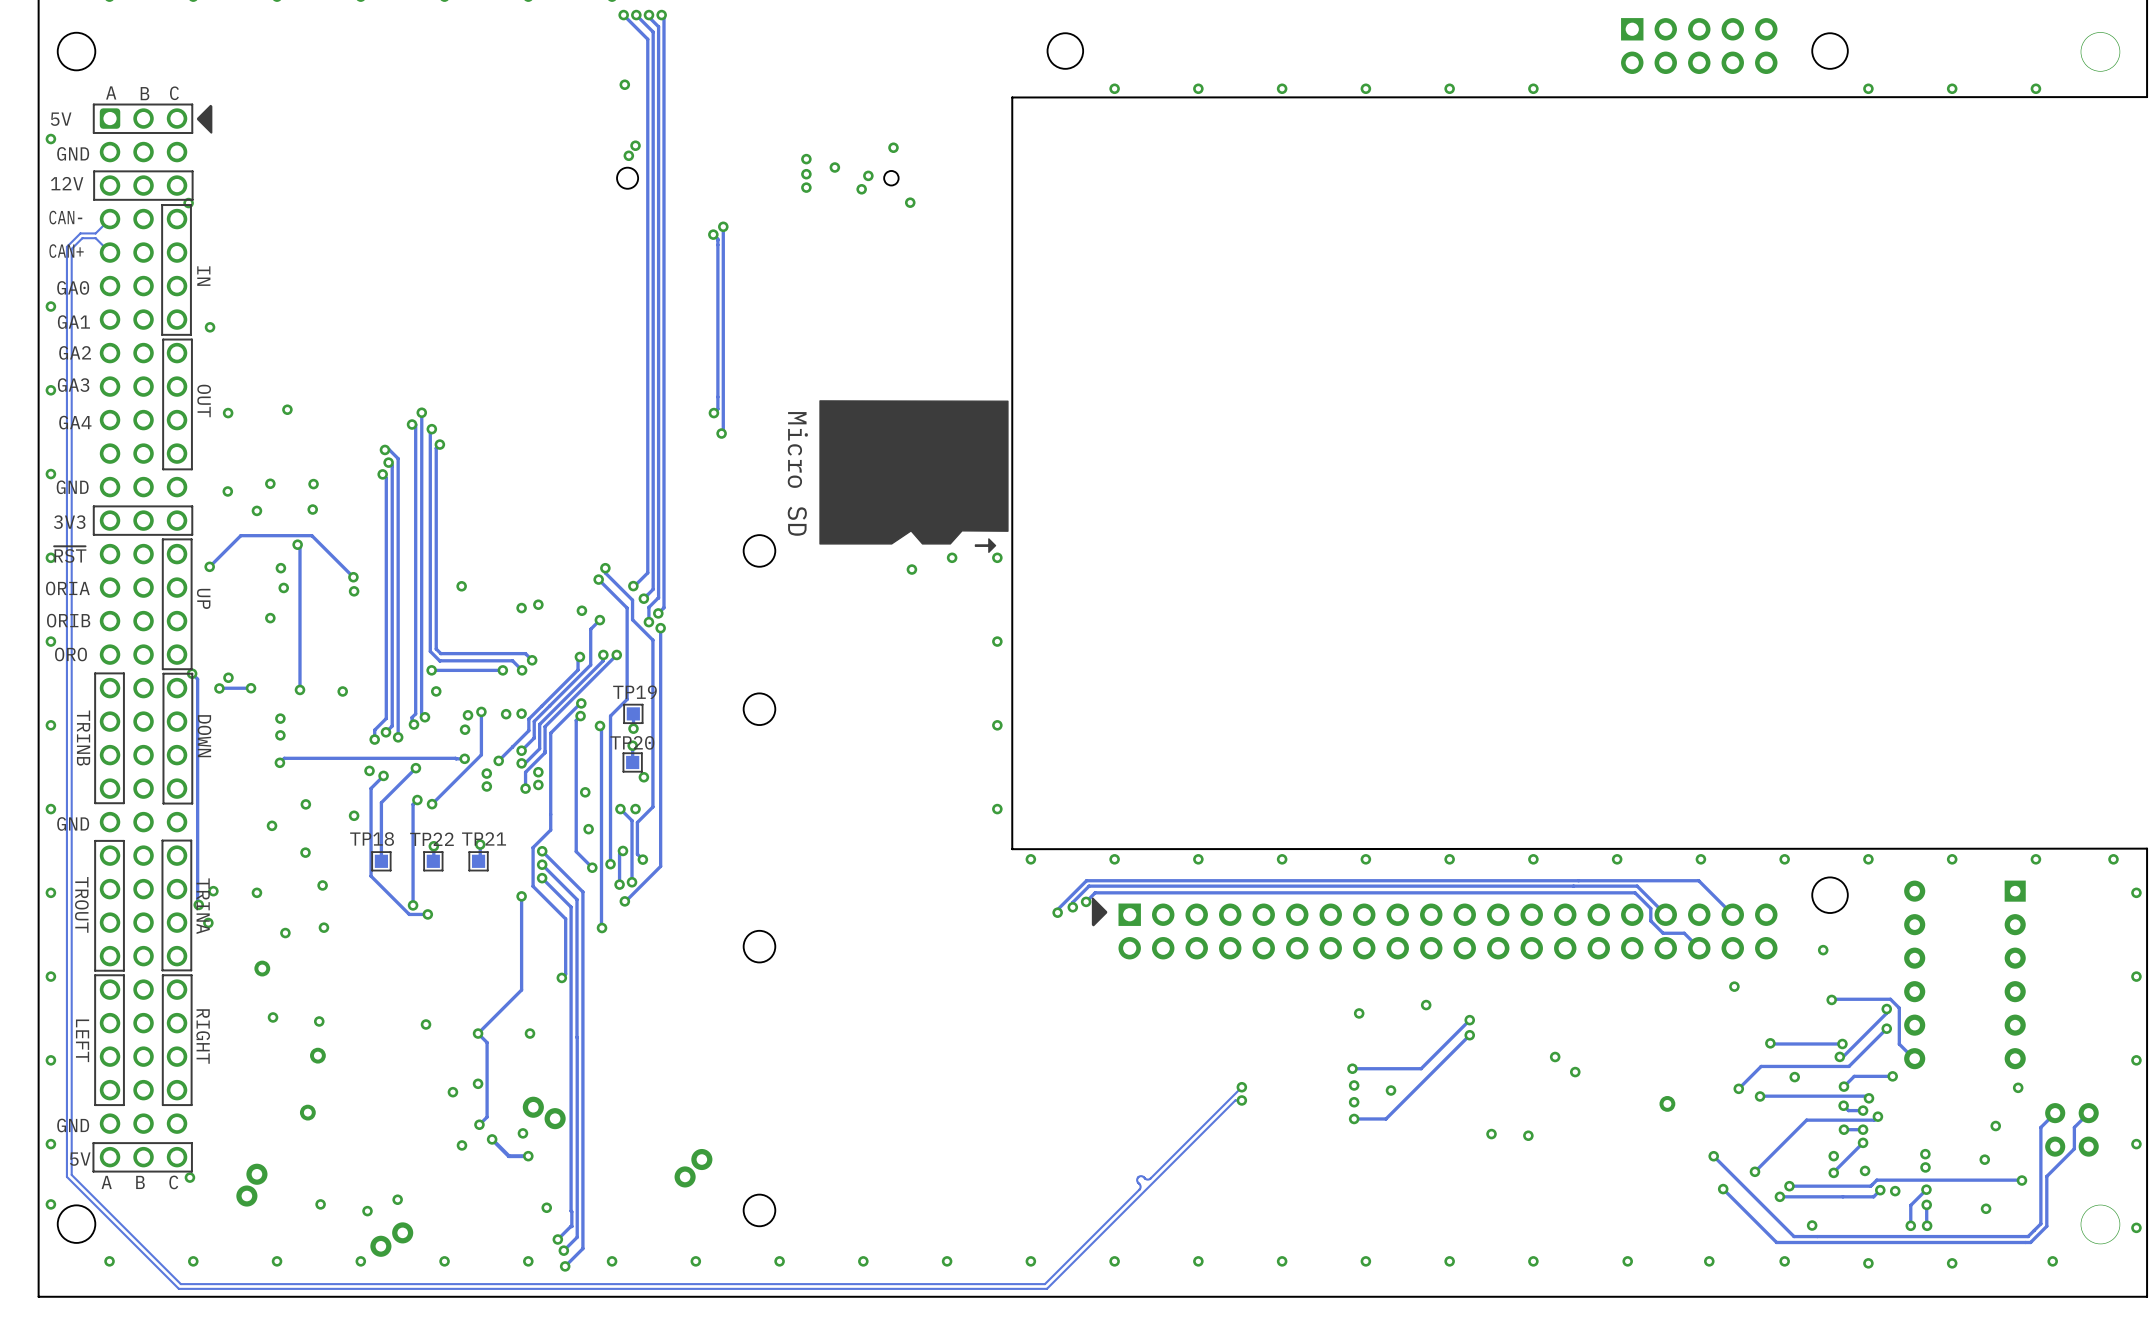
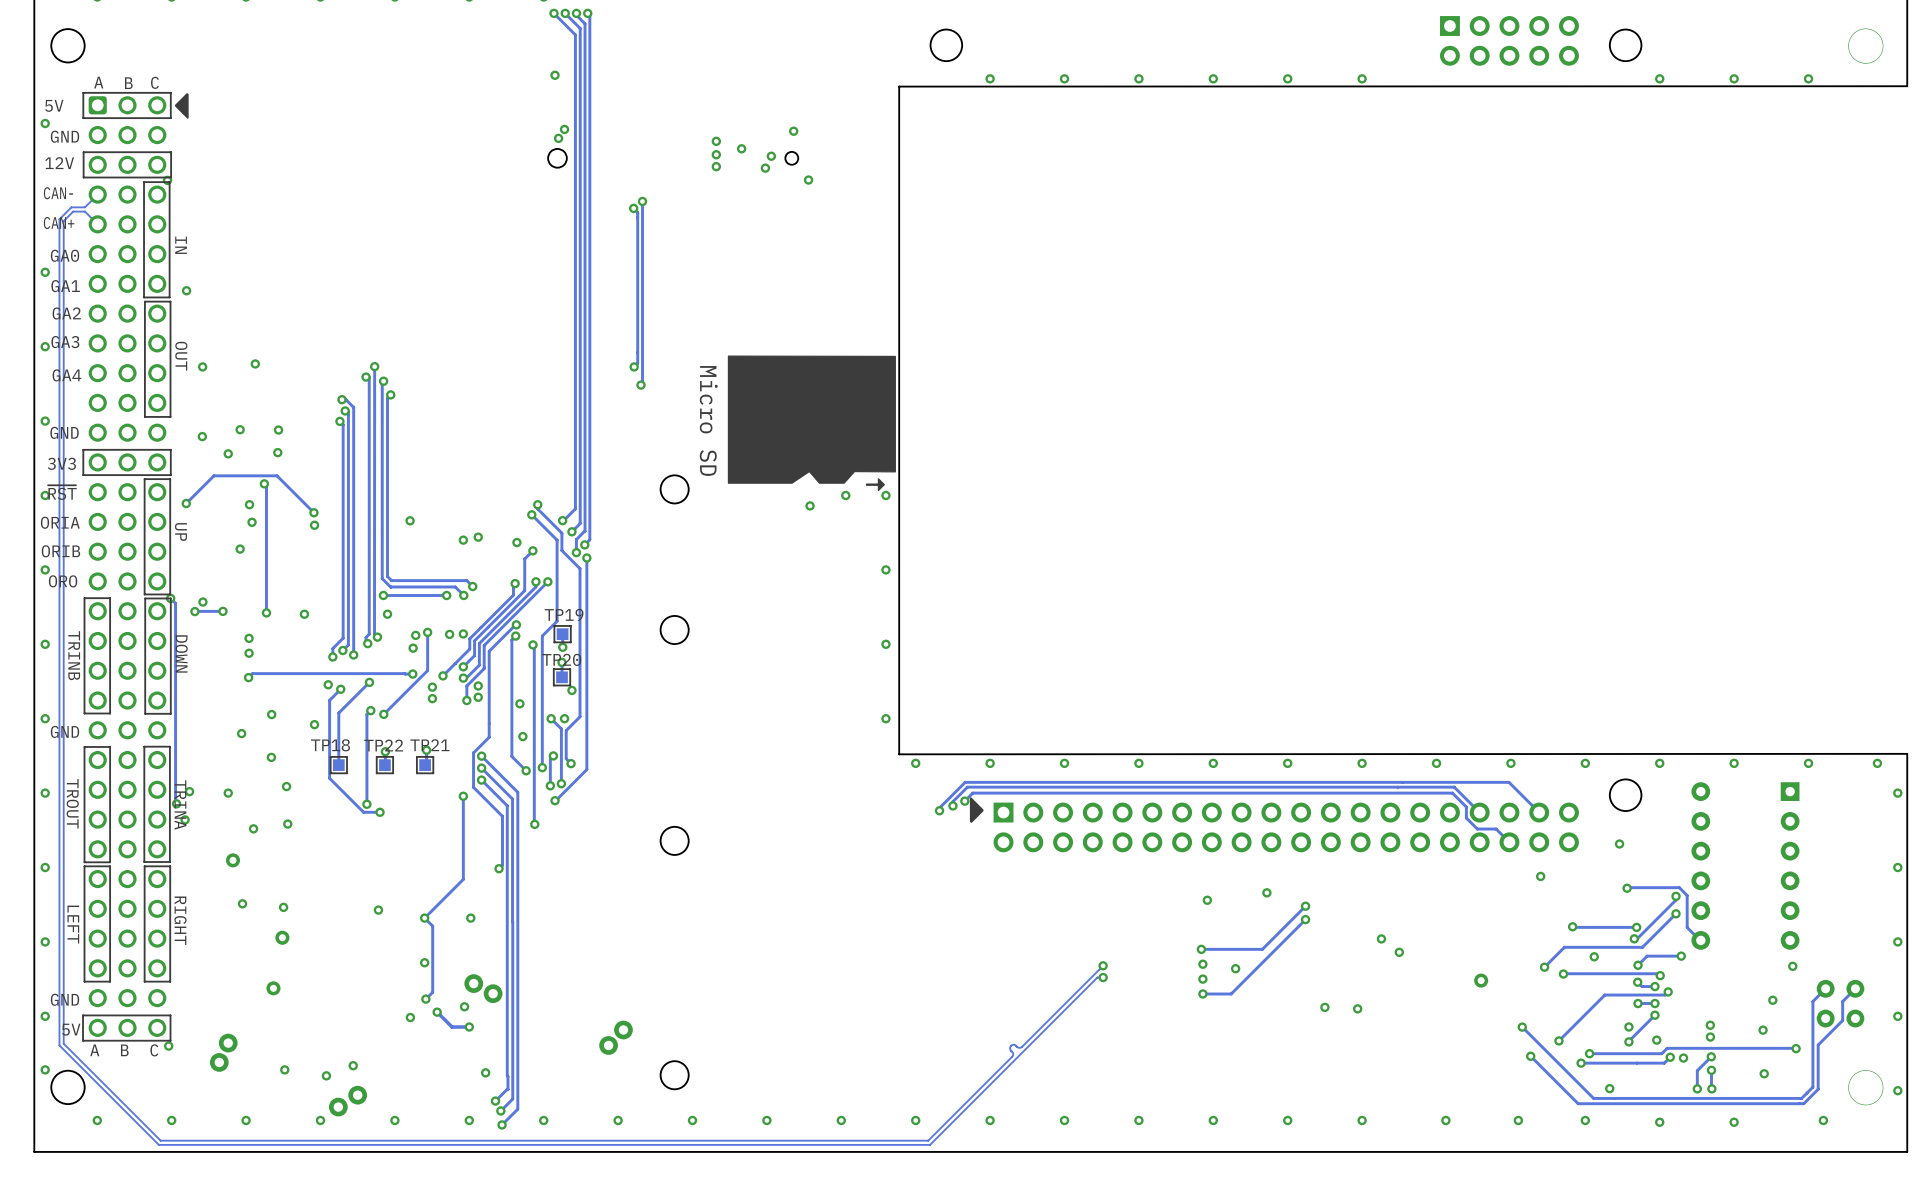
via: (452, 1092) -> none

